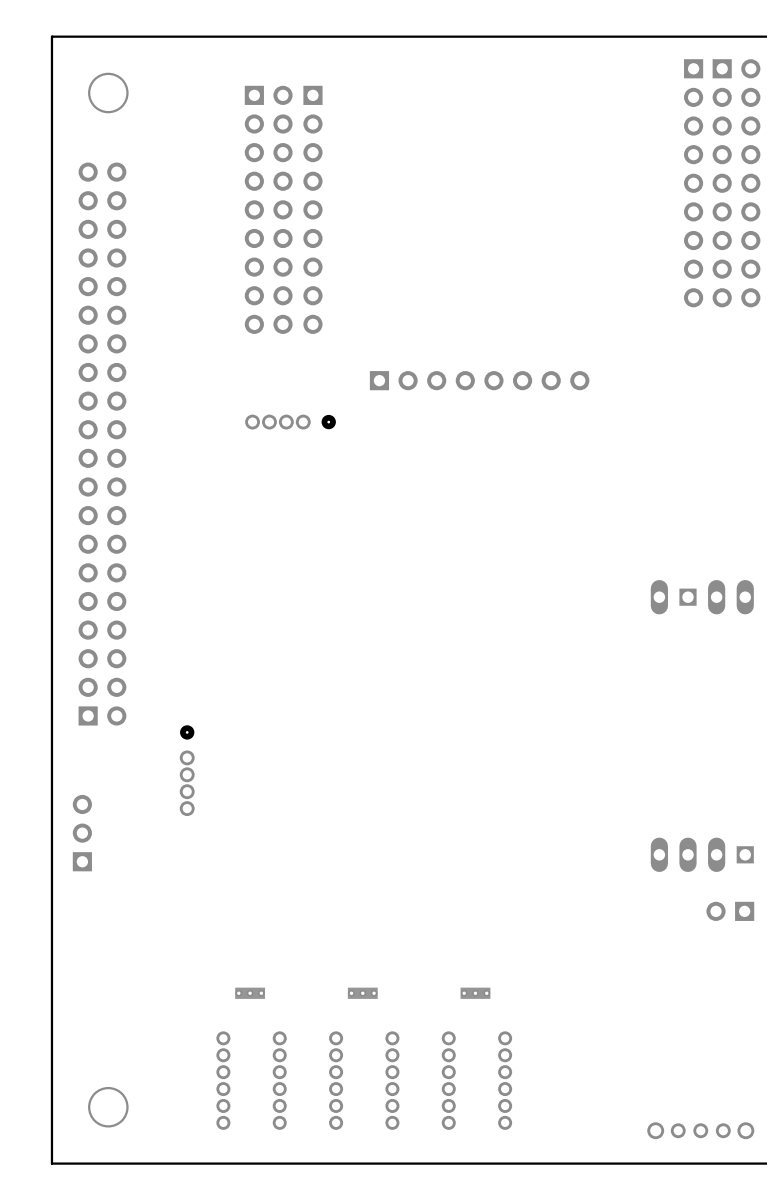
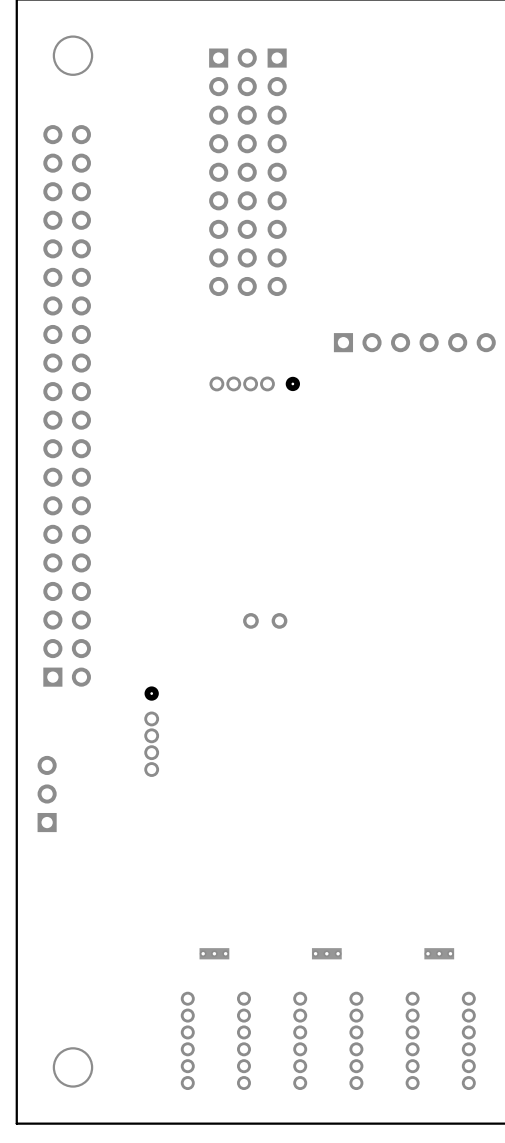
part: none -> (265, 620)

